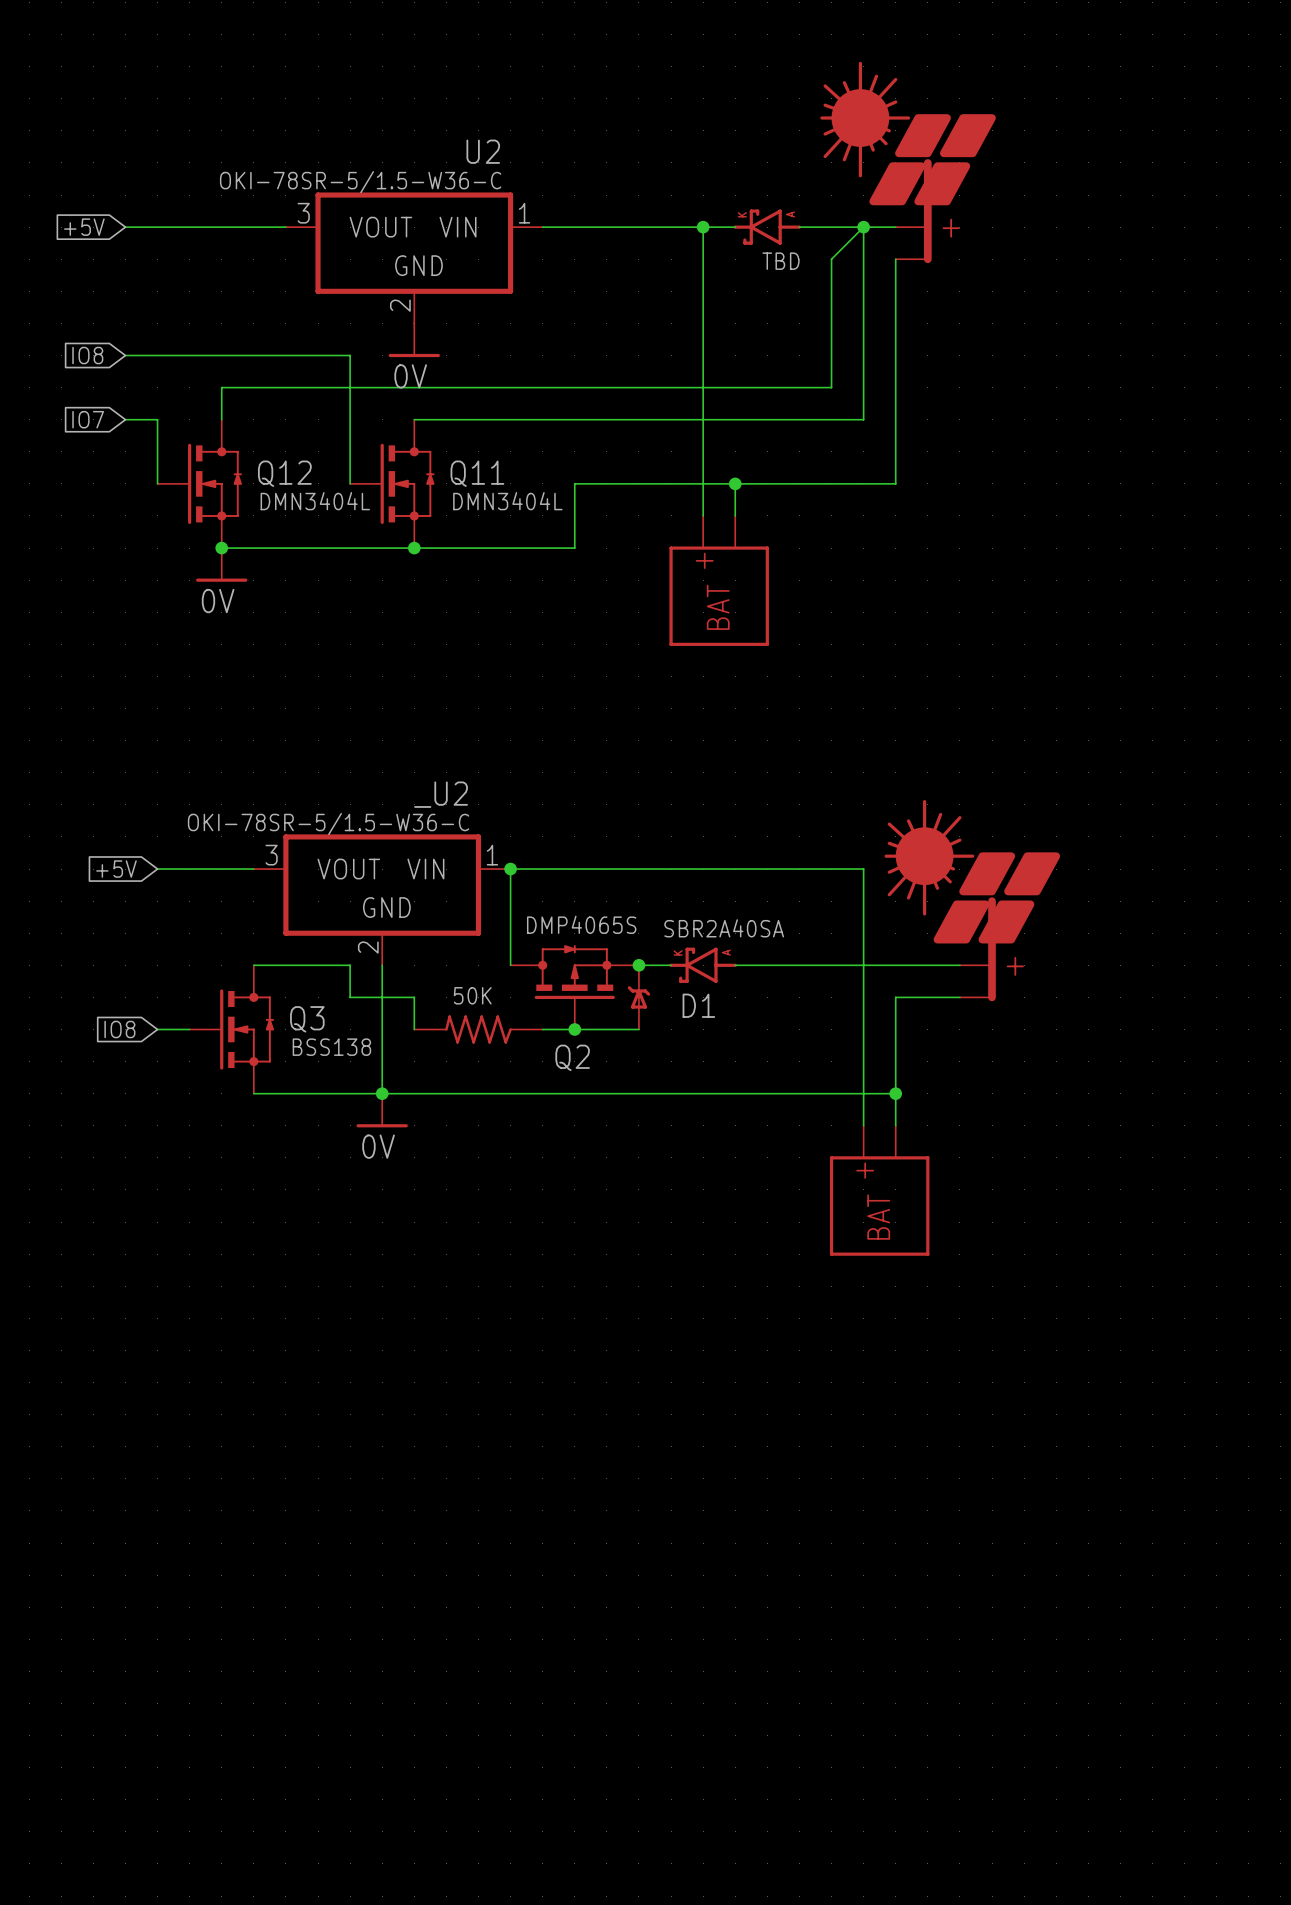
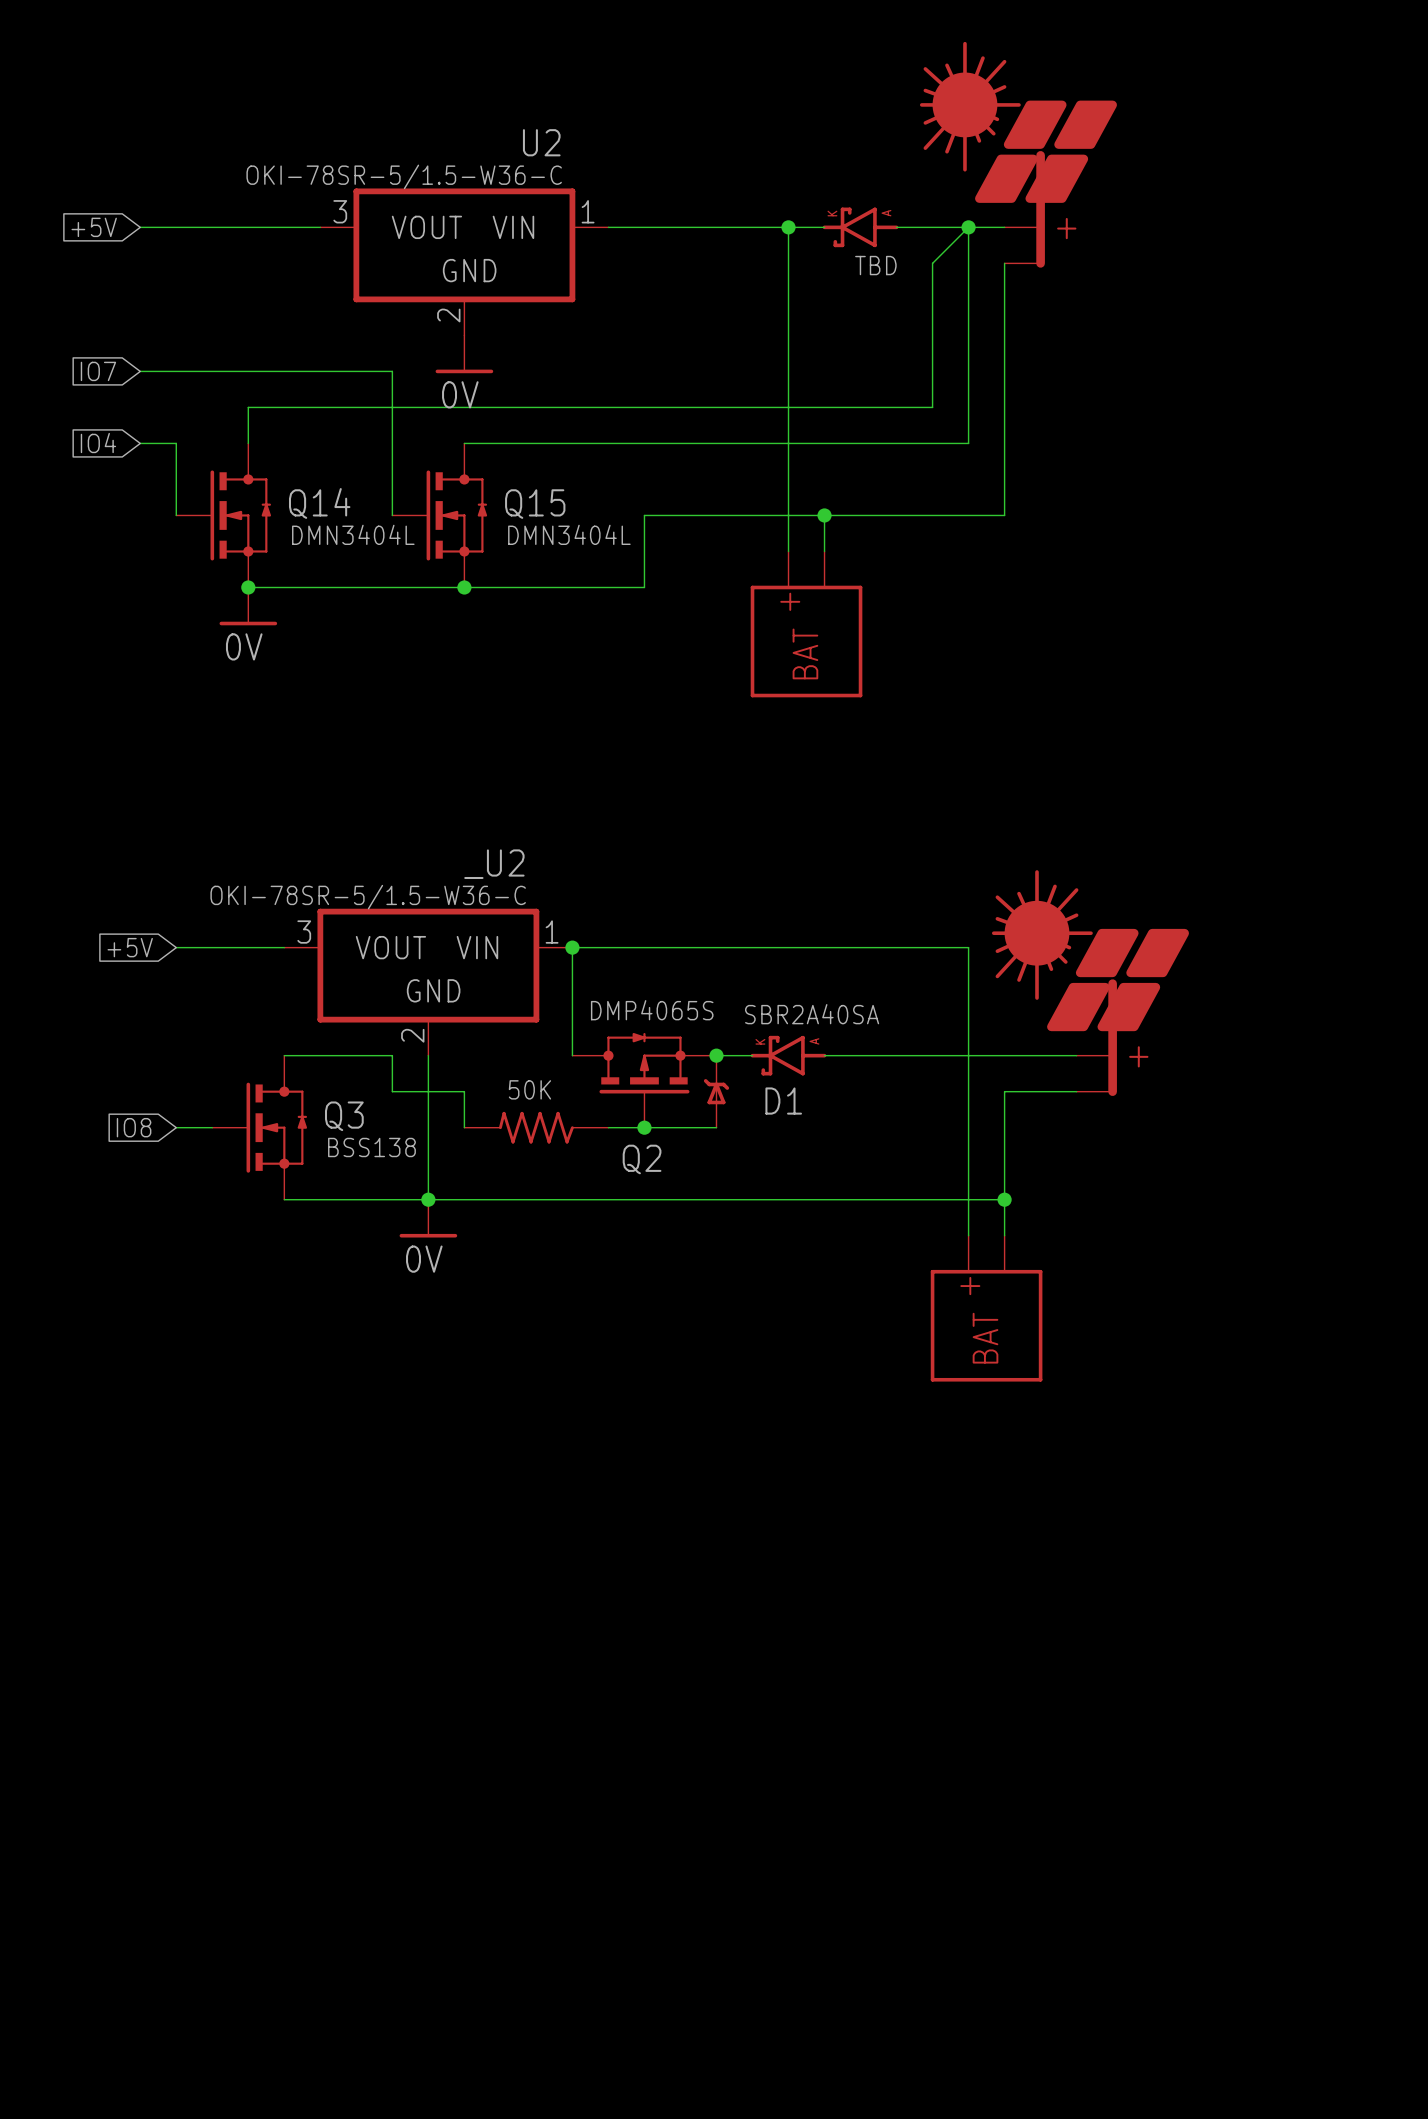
global label: IO8 (87, 355) -> IO7 (98, 371)
global label: IO7 (88, 419) -> IO4 (98, 443)
Q12 name: Q12 (284, 473) -> Q14 (319, 503)
Q11 name: Q11 (477, 473) -> Q15 (535, 504)

